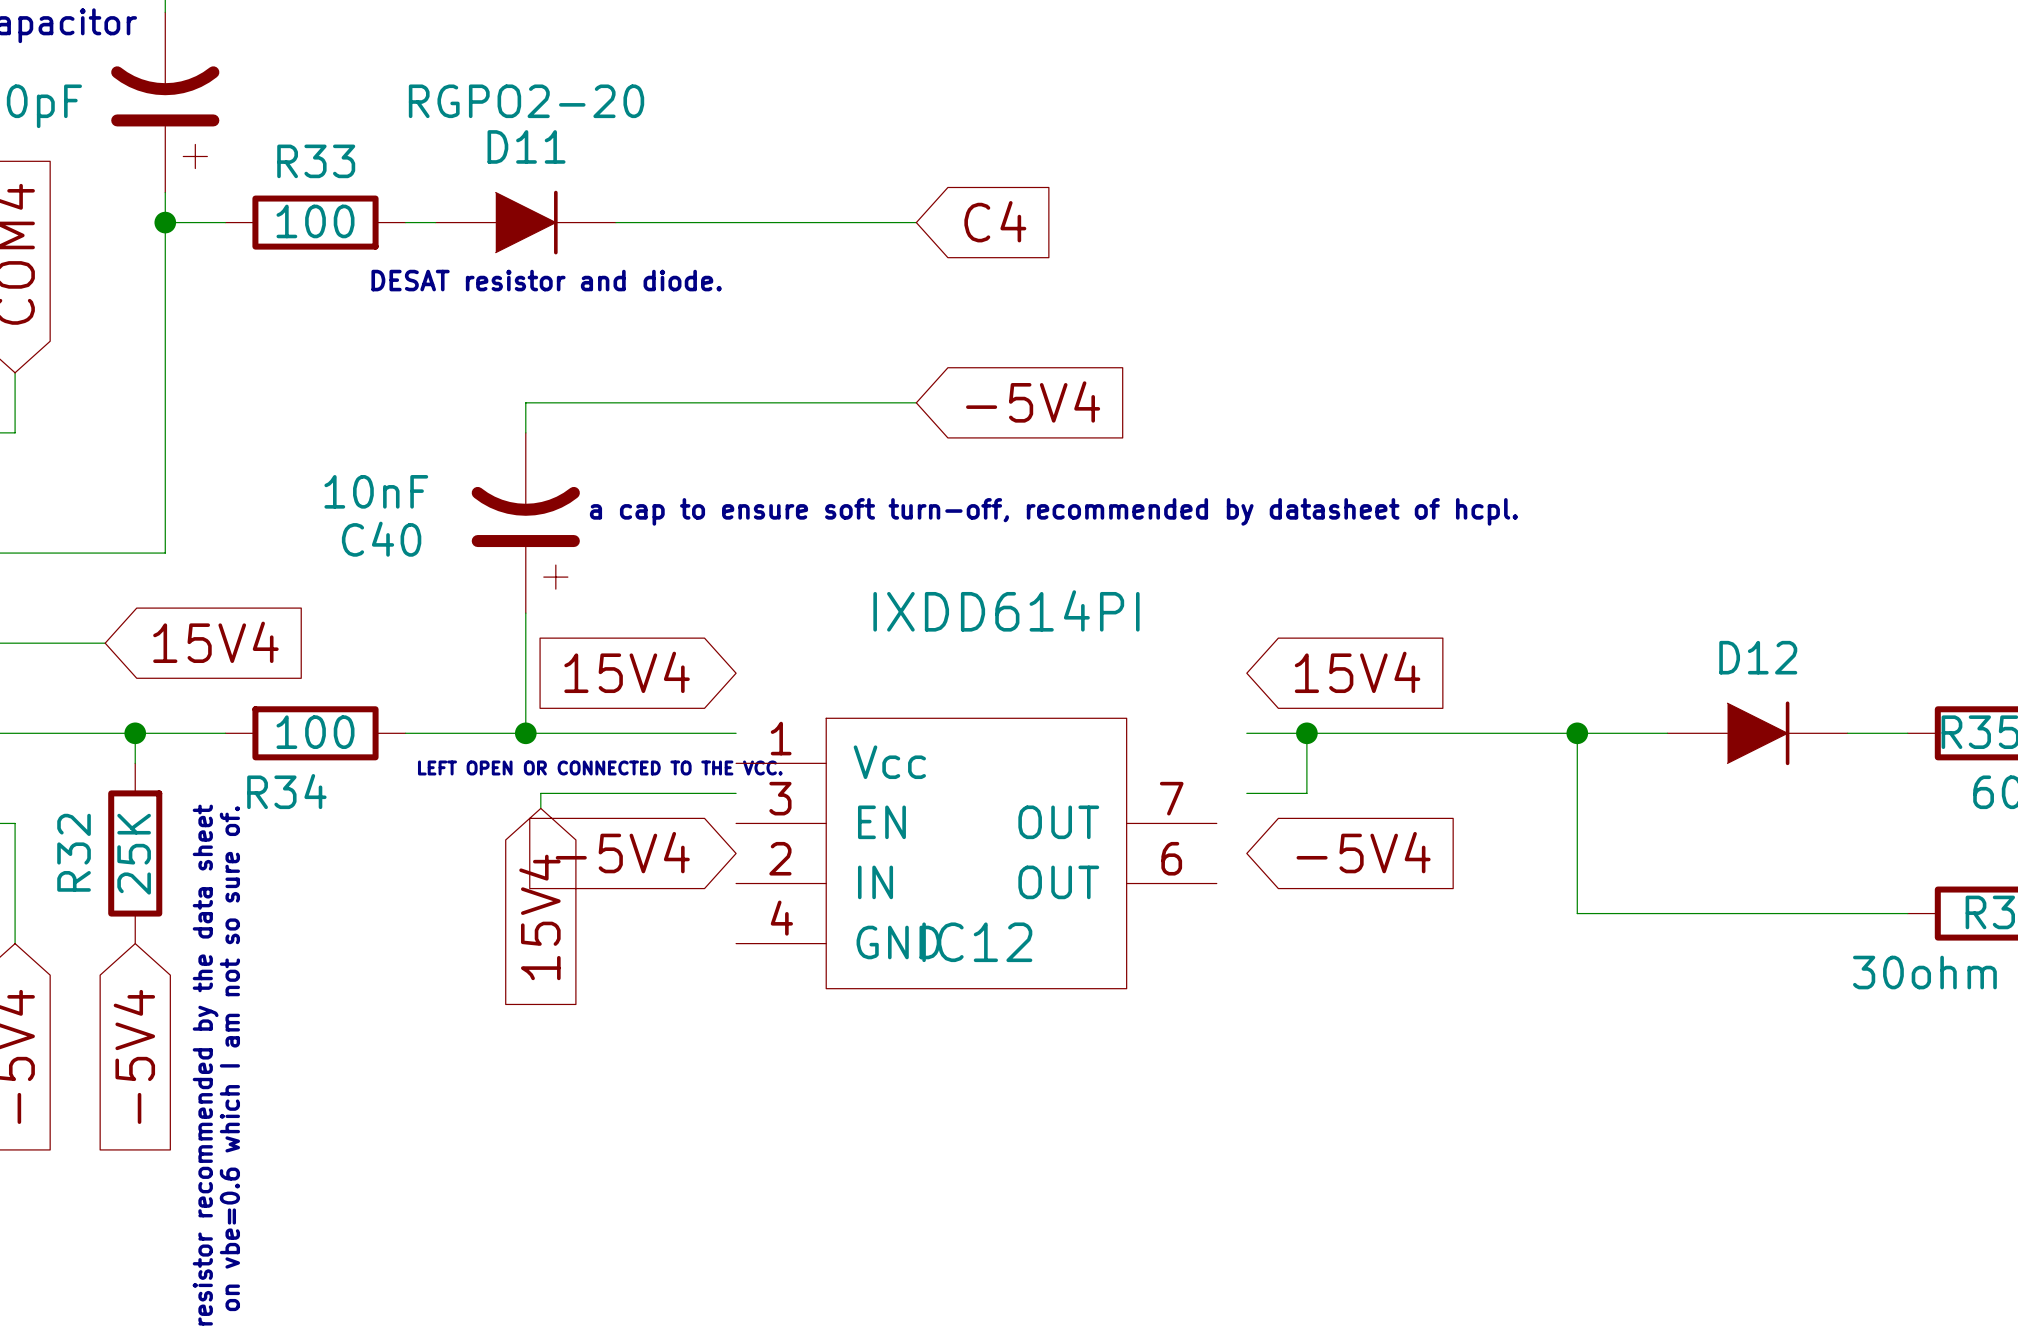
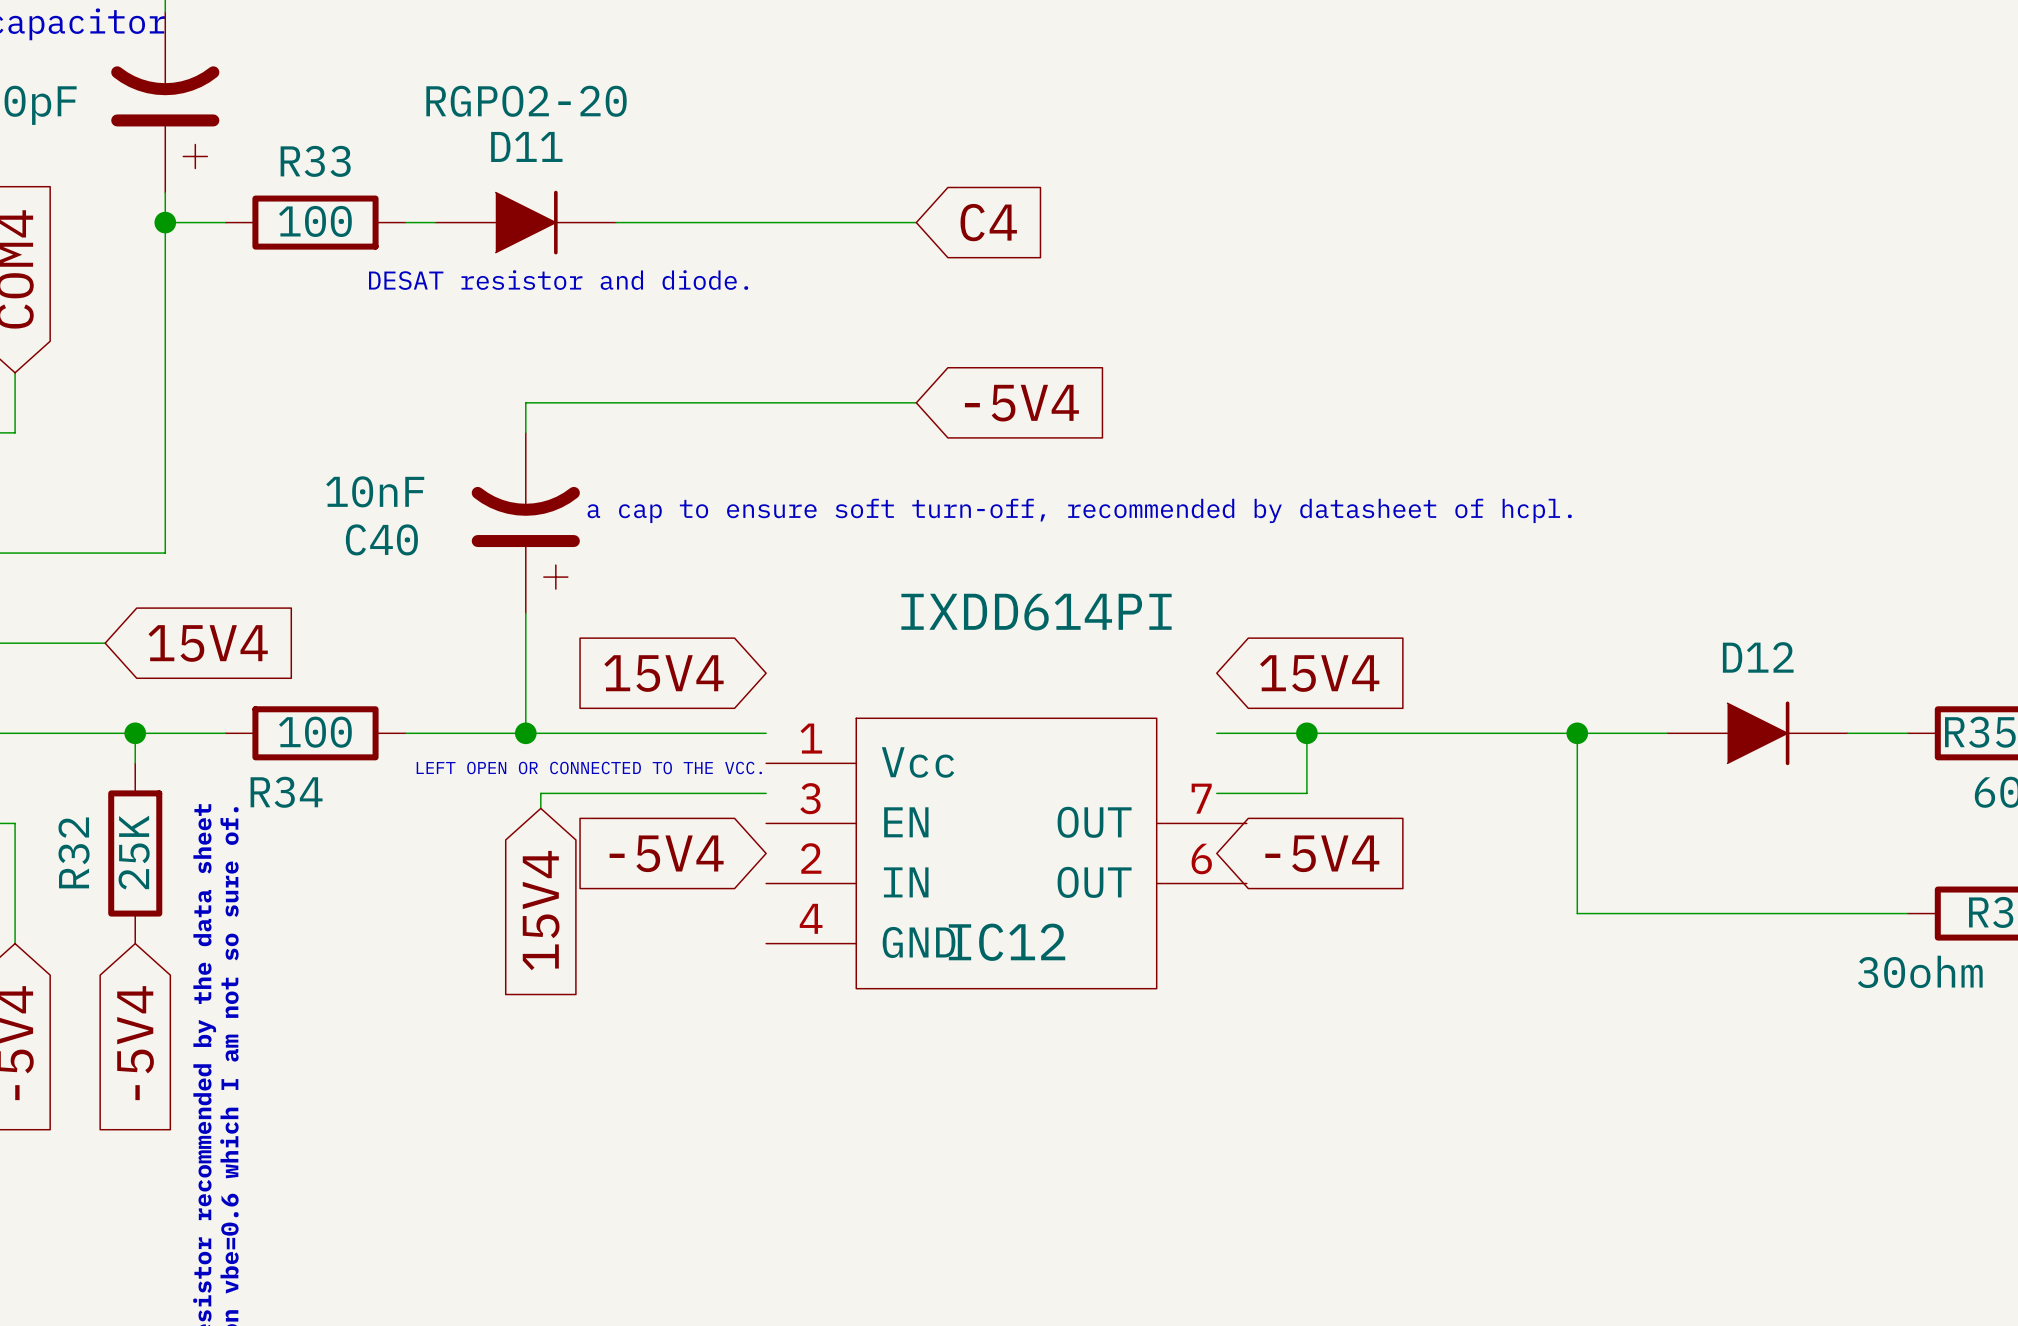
global label position: 15V4 (627, 672) -> 15V4 (663, 673)
global label position: 15V4 (1357, 672) -> 15V4 (1319, 673)
wire: none -> (736, 733) (766, 733)
wire: none -> (1216, 733) (1246, 733)
wire: none -> (736, 793) (766, 793)
wire: none -> (1216, 793) (1246, 793)
global label position: -5V4 (622, 852) -> -5V4 (666, 853)
global label position: -5V4 (1363, 852) -> -5V4 (1322, 853)
IC12 position: (976, 853) -> (1006, 853)

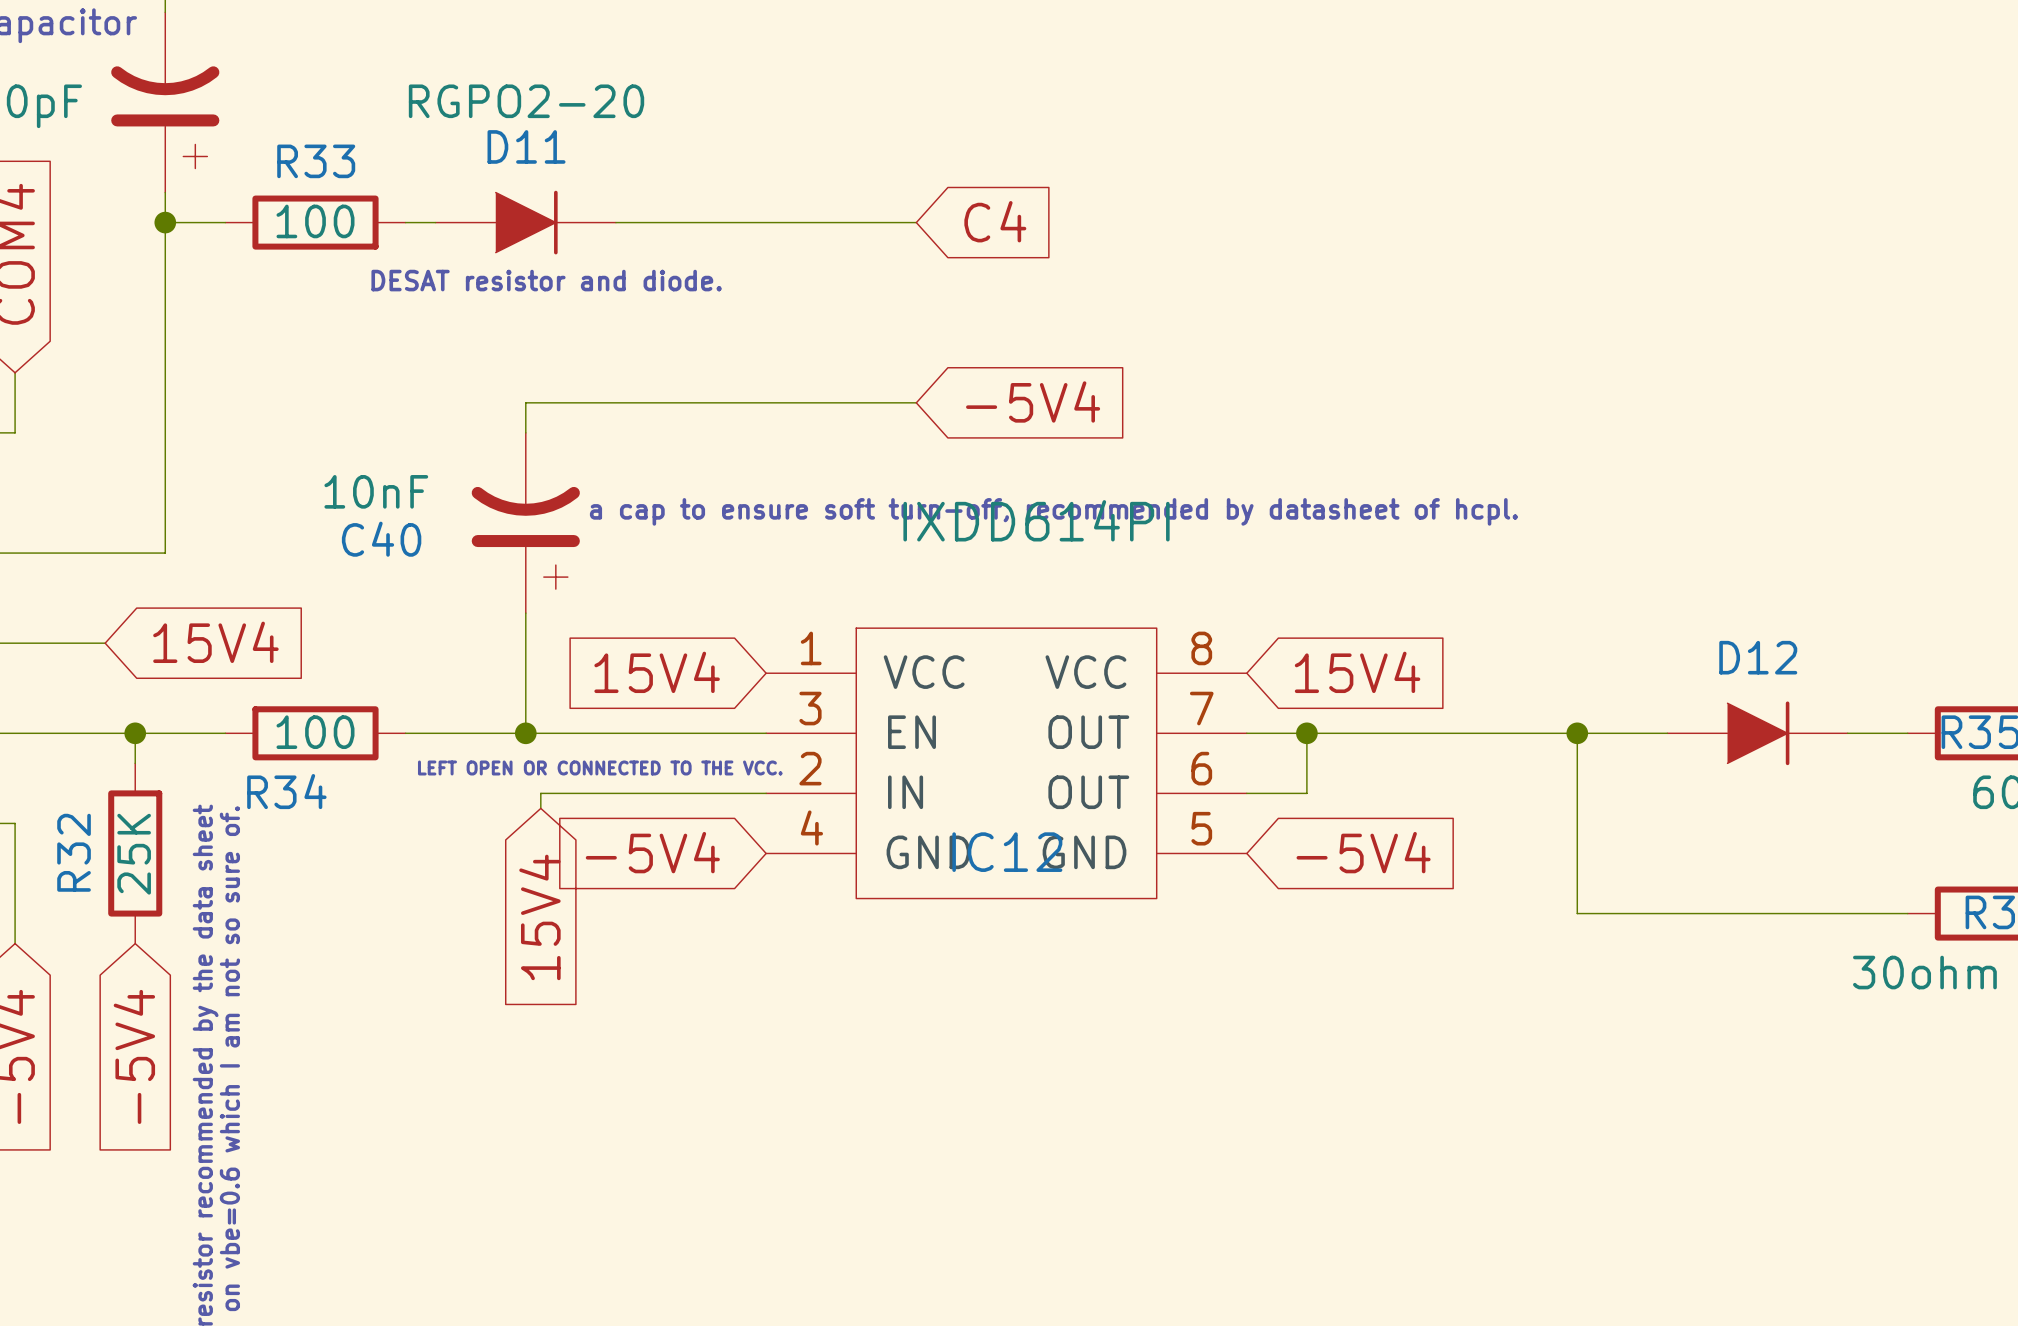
global label position: 15V4 (1319, 673) -> 15V4 (1357, 672)
IC12 symbol: [766, 718, 1247, 989] -> [766, 628, 1247, 899]
global label position: -5V4 (1322, 853) -> -5V4 (1363, 852)

